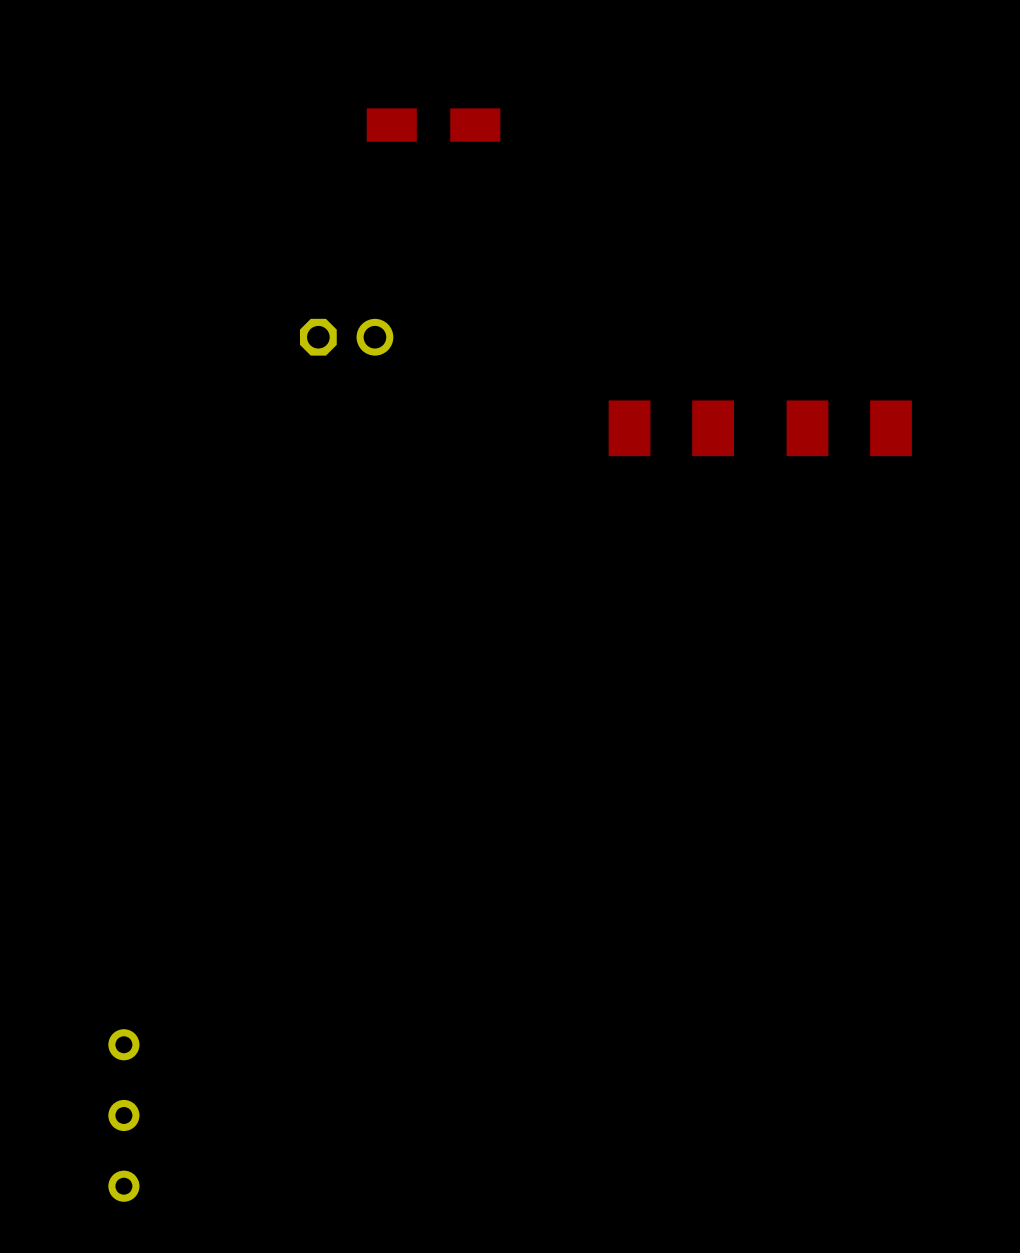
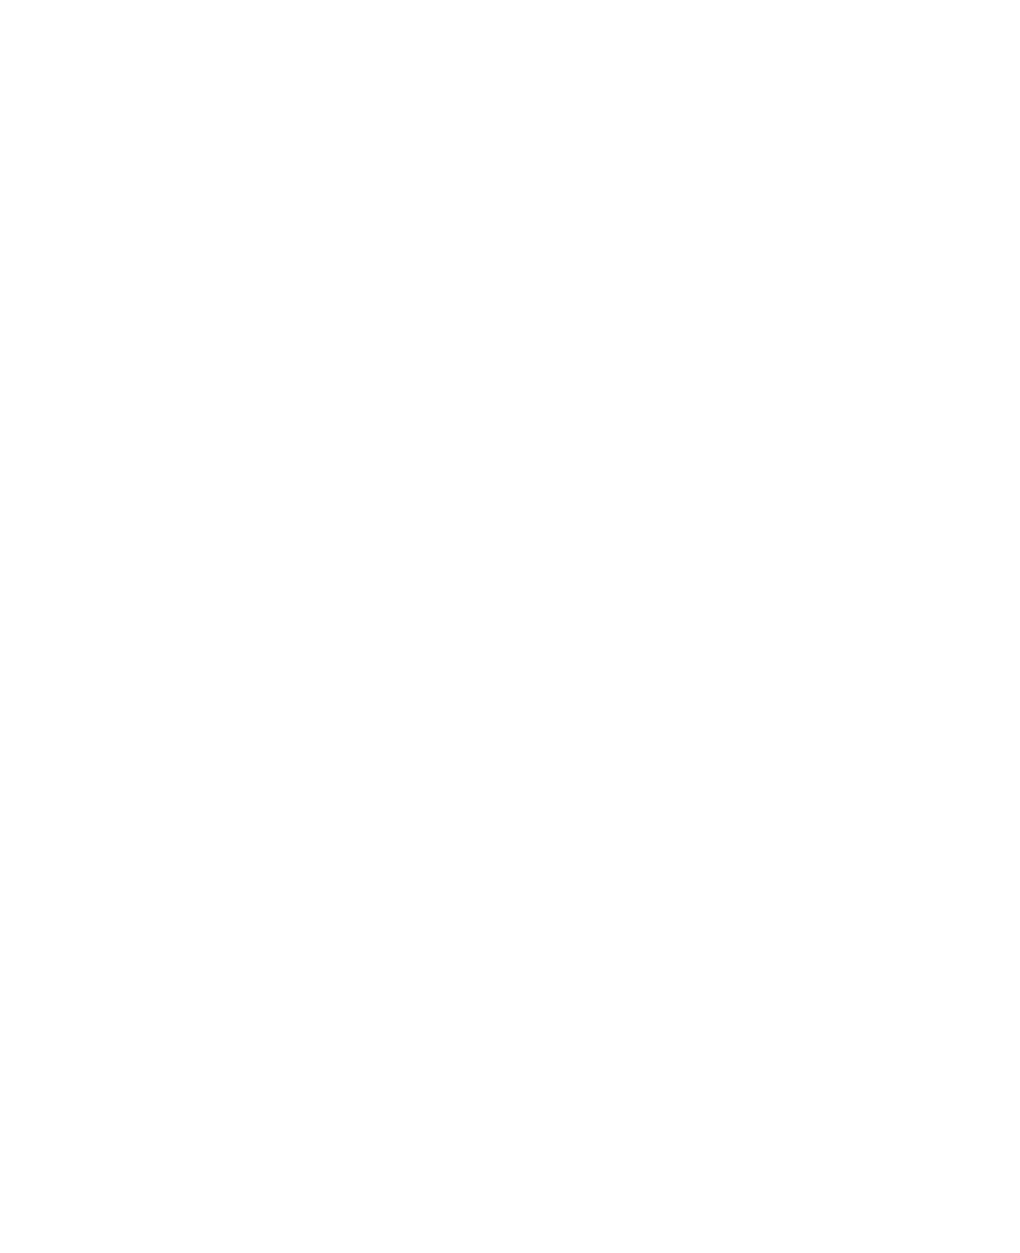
part: (433, 125) -> none
part: (346, 337) -> none
part: (671, 428) -> none
part: (849, 428) -> none
part: (123, 1115) -> none

